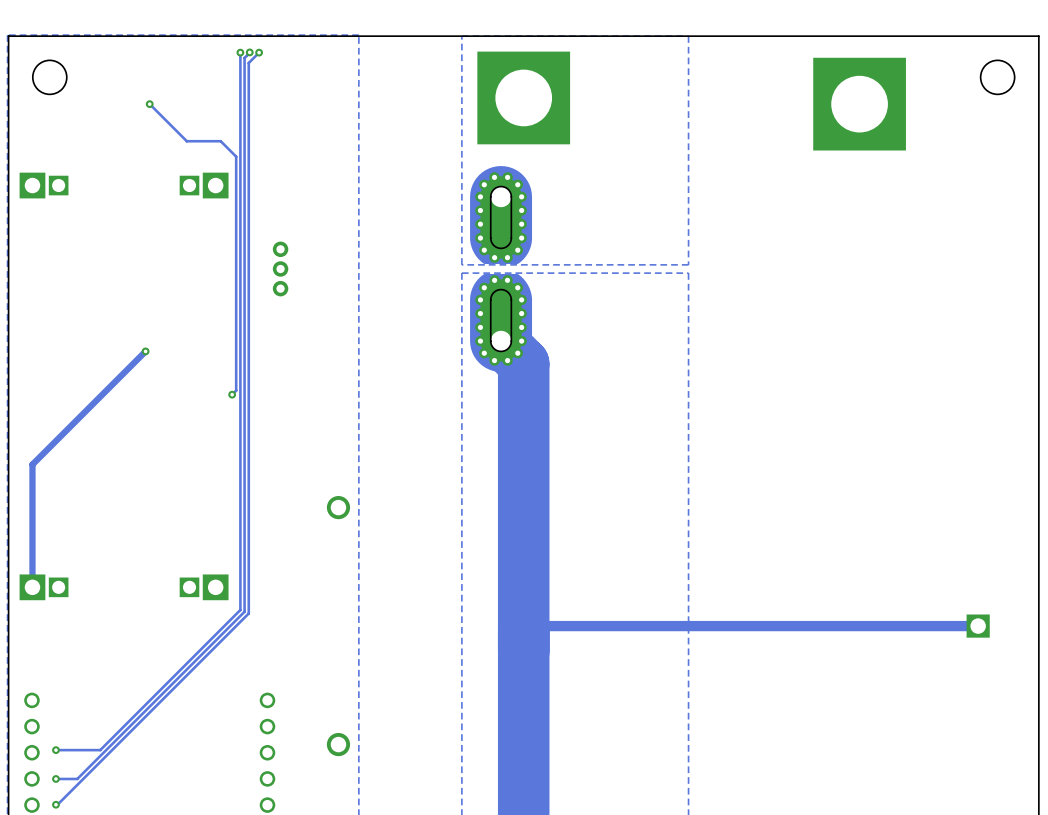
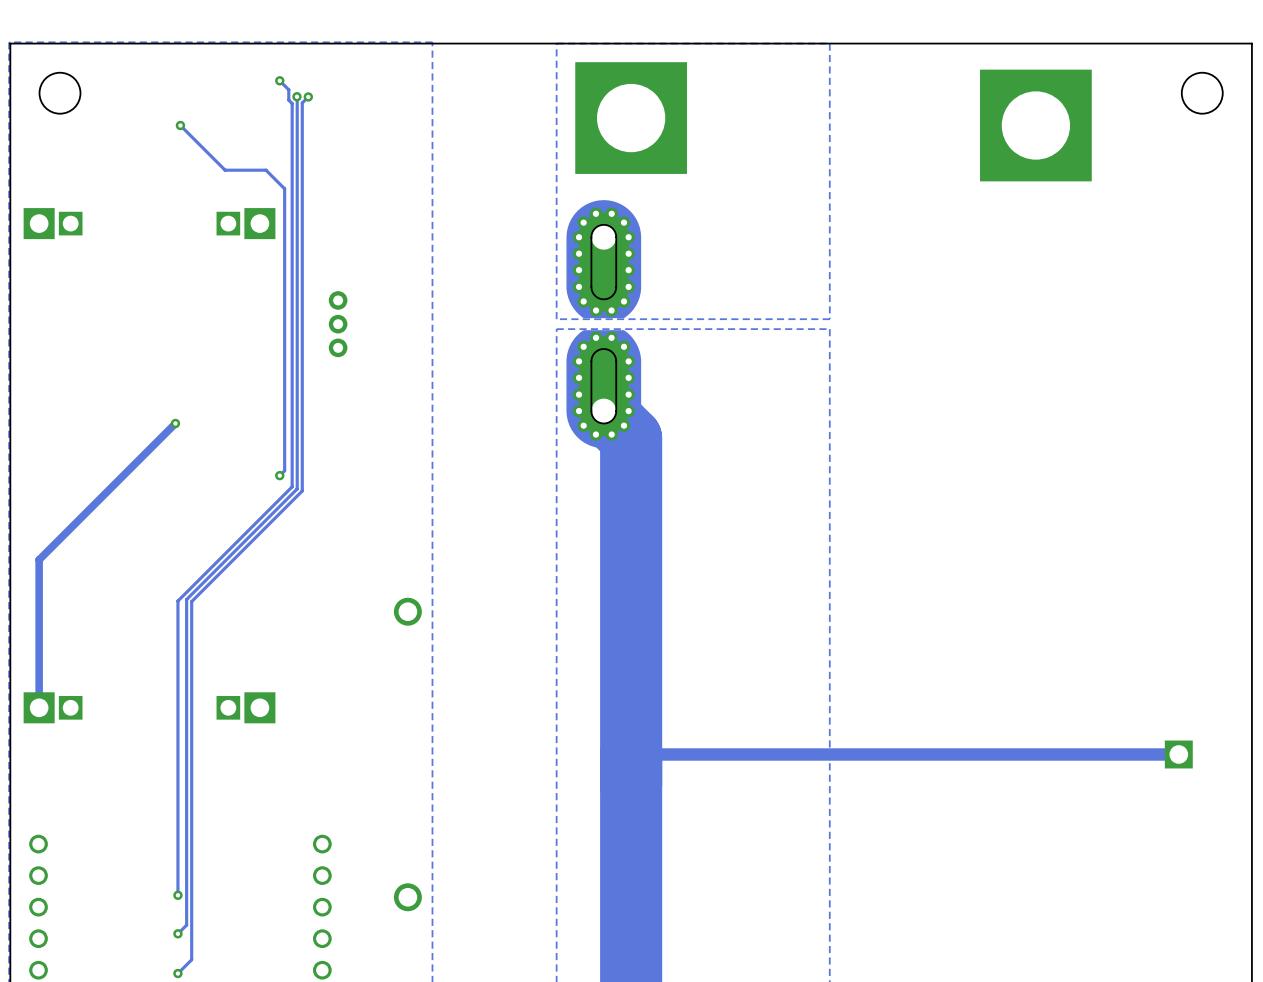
track: (240, 52) (240, 610) (100, 750) (55, 750) -> none
via: (240, 52) -> none
track: (249, 52) (244, 58) (244, 611) (77, 778) (55, 778) -> none
via: (249, 52) -> none
track: (259, 52) (248, 62) (248, 613) (55, 804) -> none
via: (259, 52) -> none
track: none -> (279, 80) (288, 89) (288, 100) (292, 103) (292, 486) (177, 601) (177, 895)
via: none -> (279, 80)
track: none -> (296, 96) (297, 488) (186, 599) (186, 925) (177, 933)
via: none -> (296, 96)
track: none -> (308, 96) (302, 102) (302, 490) (191, 601) (191, 959) (177, 973)
via: none -> (308, 96)
via: none -> (177, 895)
via: (55, 750) -> none
via: none -> (177, 933)
via: (55, 778) -> none
via: (55, 804) -> none
via: none -> (177, 973)

